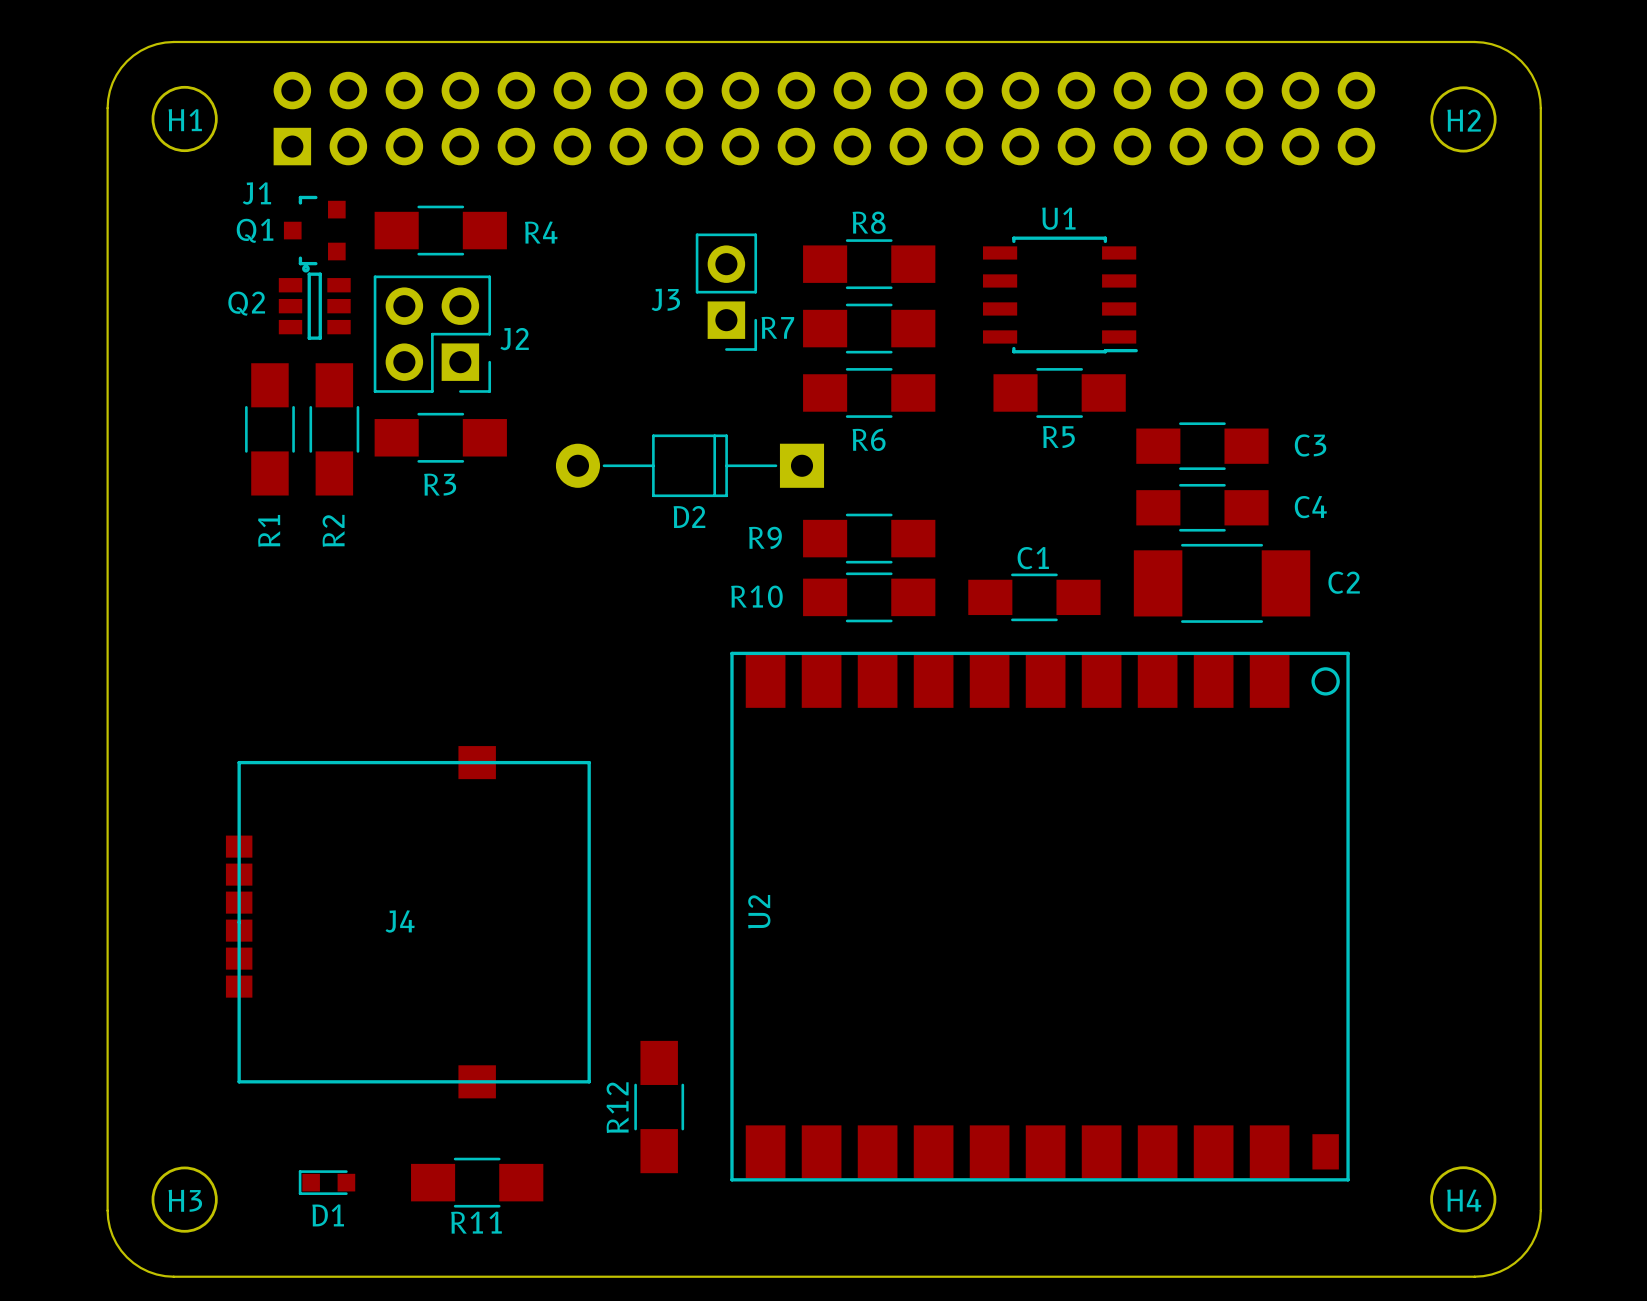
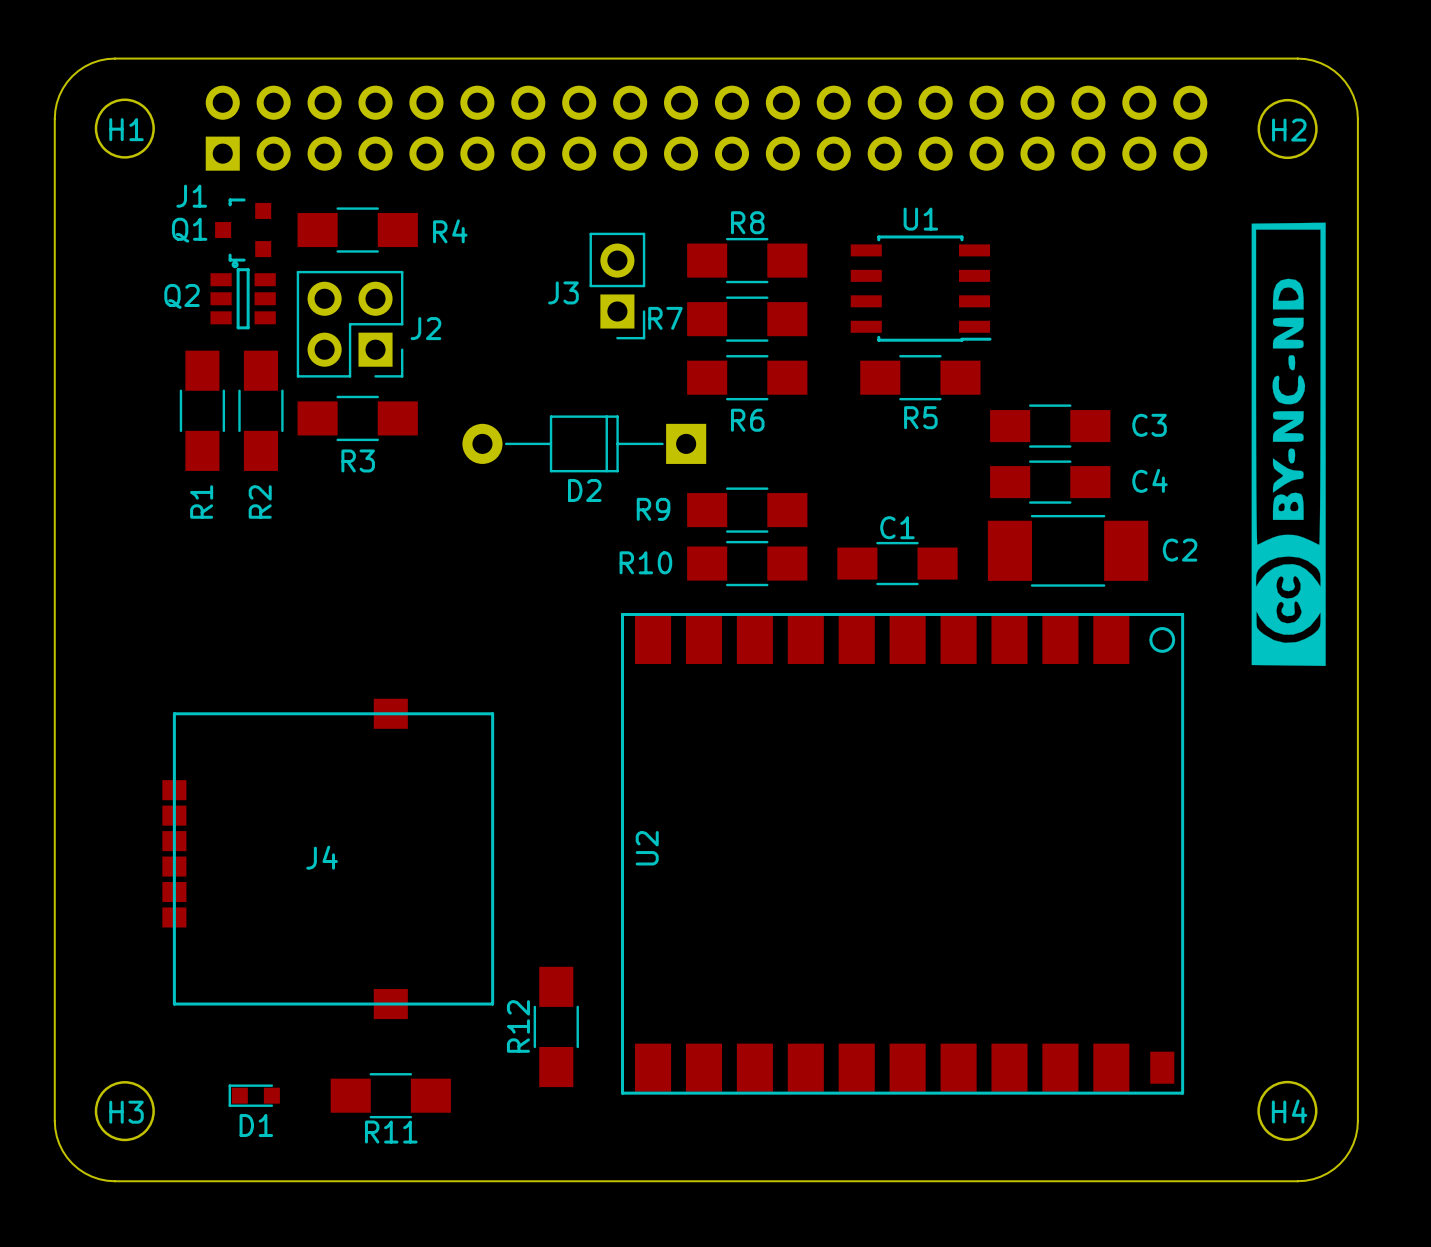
drawing: none -> [1251, 222, 1326, 667]

